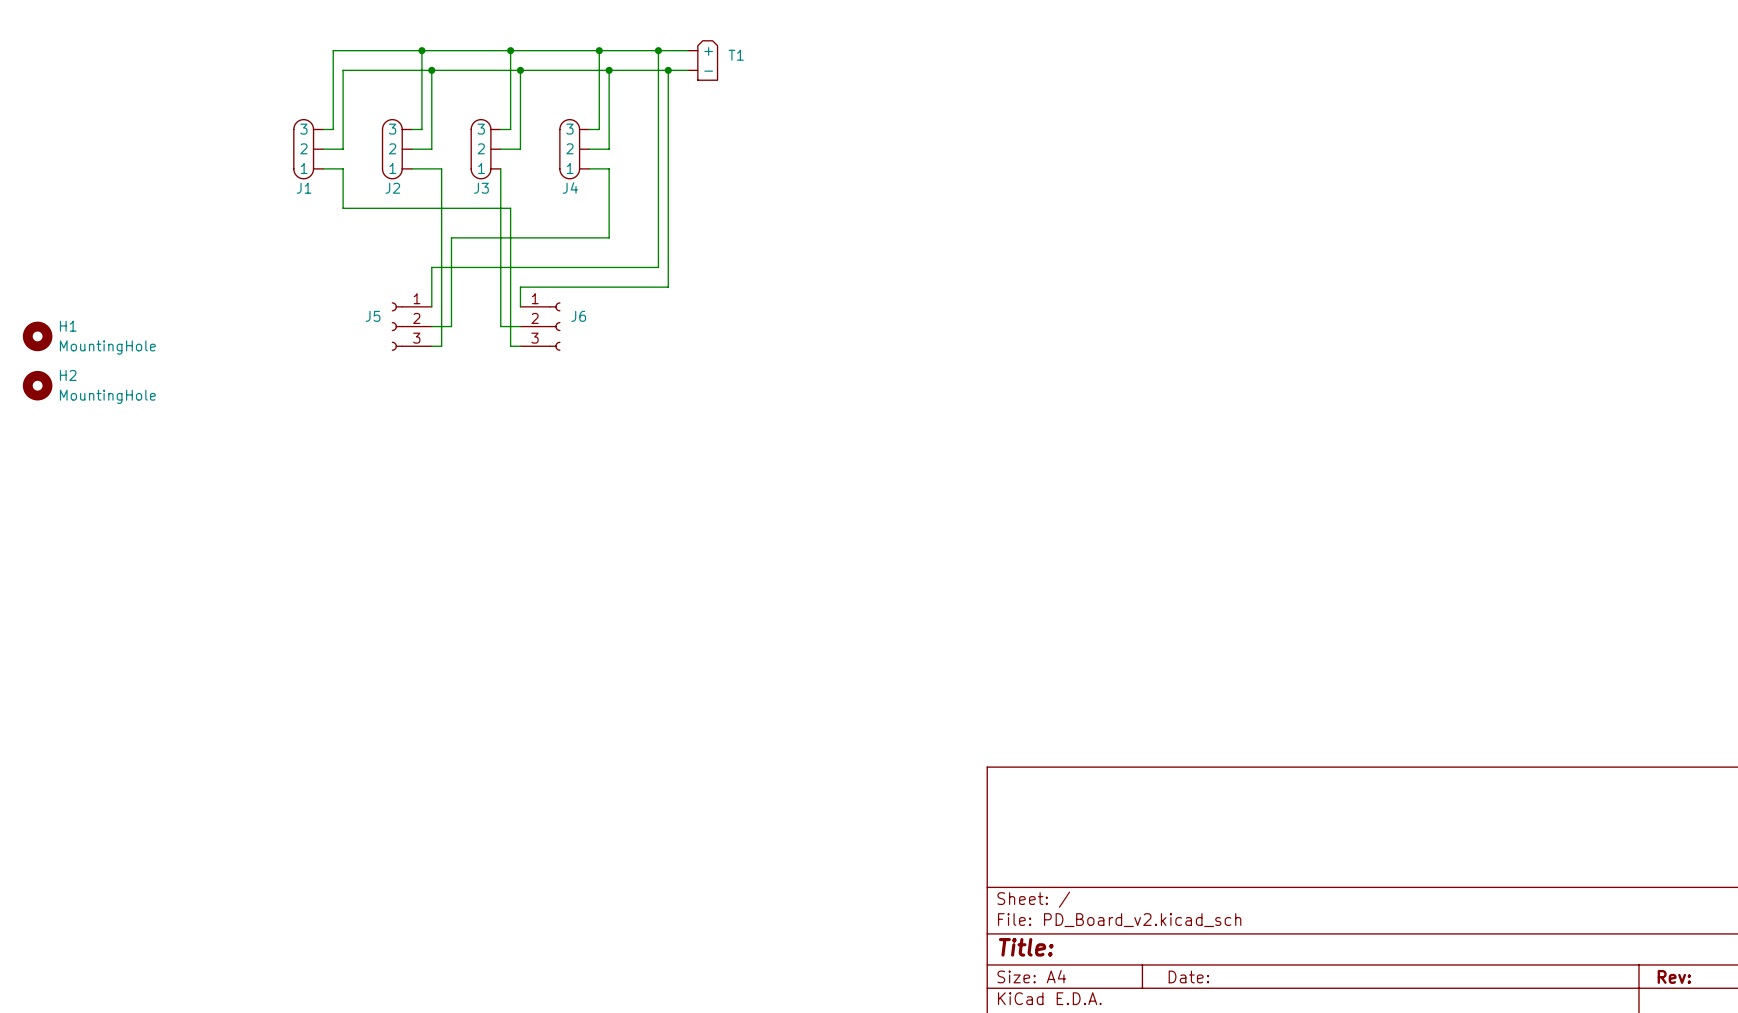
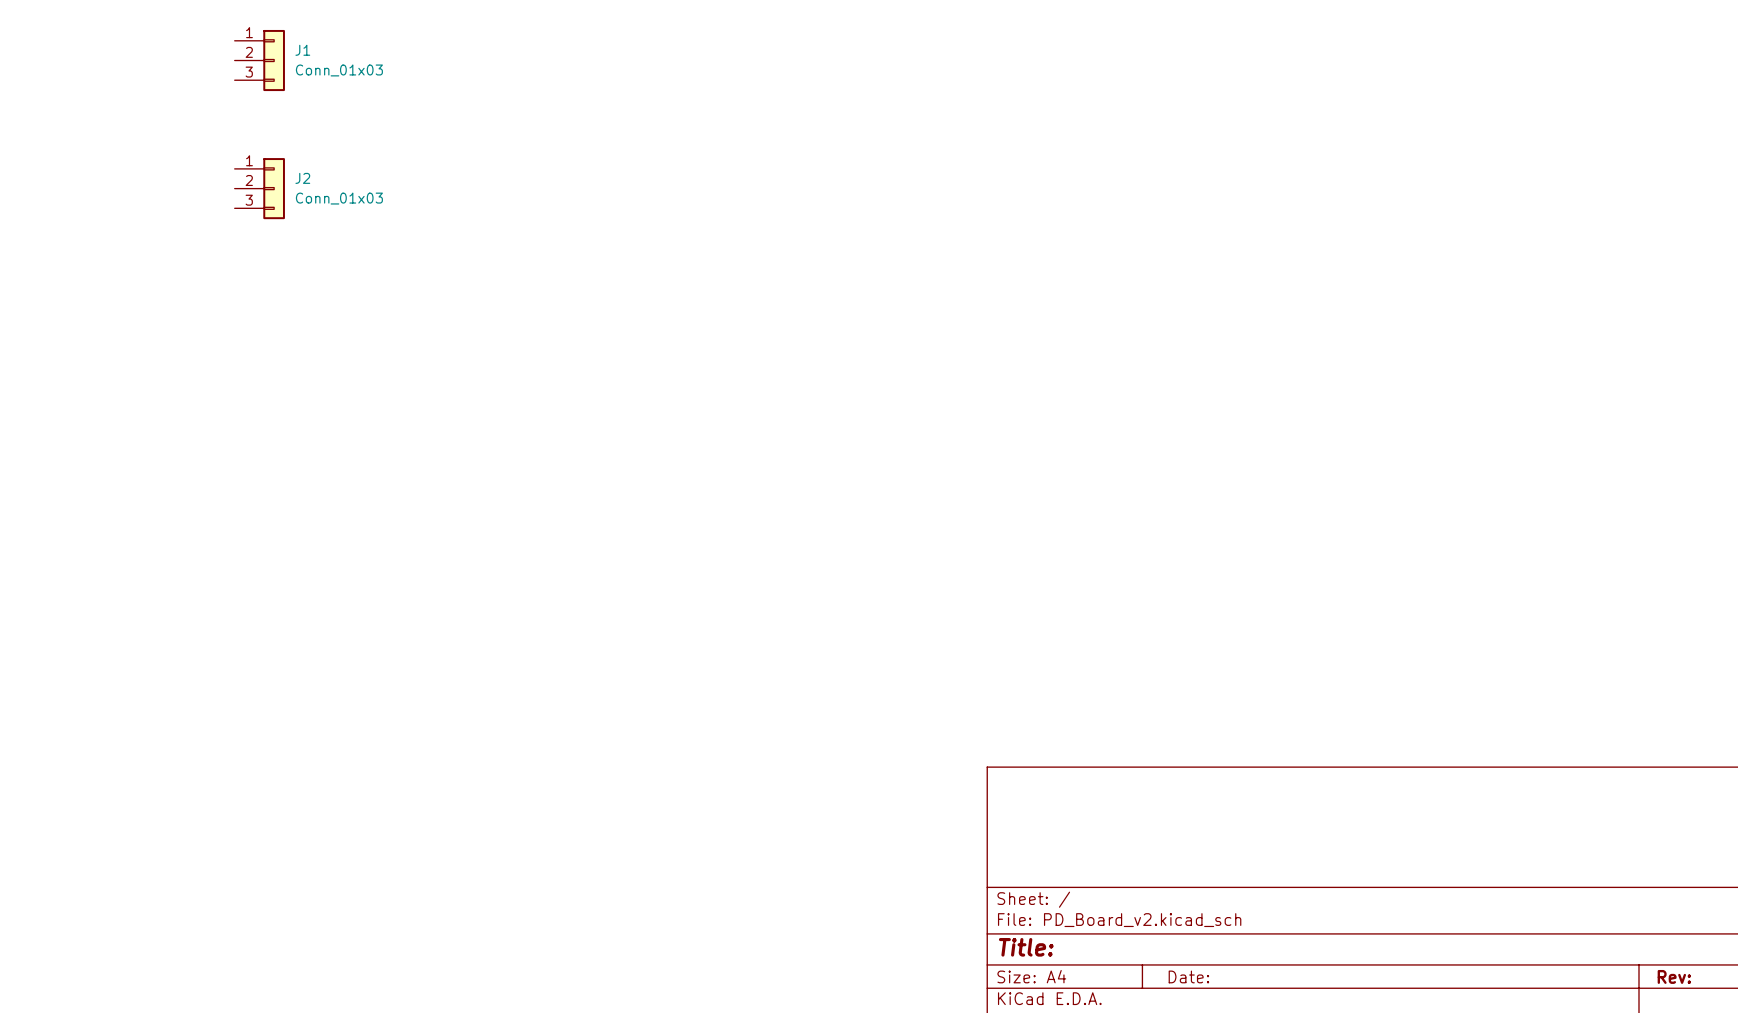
wire: (421, 50) (421, 129) (412, 129) -> none
junction: (421, 50) -> none
wire: (510, 50) (510, 129) (500, 129) -> none
junction: (510, 50) -> none
wire: (599, 50) (599, 129) (589, 129) -> none
junction: (599, 50) -> none
wire: (658, 50) (658, 267) (431, 267) (431, 306) -> none
junction: (658, 50) -> none
wire: (687, 50) (333, 50) (333, 129) (323, 129) -> none
T1: (702, 60) -> none
J1 value: none -> Conn_01x03 (339, 70)
wire: (431, 70) (431, 149) (412, 149) -> none
junction: (431, 70) -> none
wire: (520, 70) (520, 149) (500, 149) -> none
junction: (520, 70) -> none
wire: (609, 70) (609, 149) (589, 149) -> none
junction: (609, 70) -> none
wire: (668, 70) (668, 287) (520, 287) (520, 306) -> none
junction: (668, 70) -> none
wire: (687, 70) (343, 70) (343, 149) (323, 149) -> none
J1 symbol: [293, 119, 324, 179] -> [234, 29, 285, 92]
J2 symbol: [382, 119, 413, 179] -> [234, 158, 285, 220]
J3: (485, 149) -> none
J4: (574, 149) -> none
wire: (323, 168) (343, 168) (343, 208) (510, 208) (510, 346) (520, 346) -> none
wire: (412, 168) (441, 168) (441, 346) (431, 346) -> none
wire: (500, 168) (500, 326) (520, 326) -> none
wire: (589, 168) (609, 168) (609, 237) (451, 237) (451, 326) (431, 326) -> none
J1 name position: J1 (304, 188) -> J1 (302, 50)
J2 name position: J2 (392, 188) -> J2 (302, 178)
J2 value: none -> Conn_01x03 (339, 198)
J5: (411, 326) -> none
J6: (540, 326) -> none
H1: MountingHole (37, 336) -> none
H2: MountingHole (37, 385) -> none

